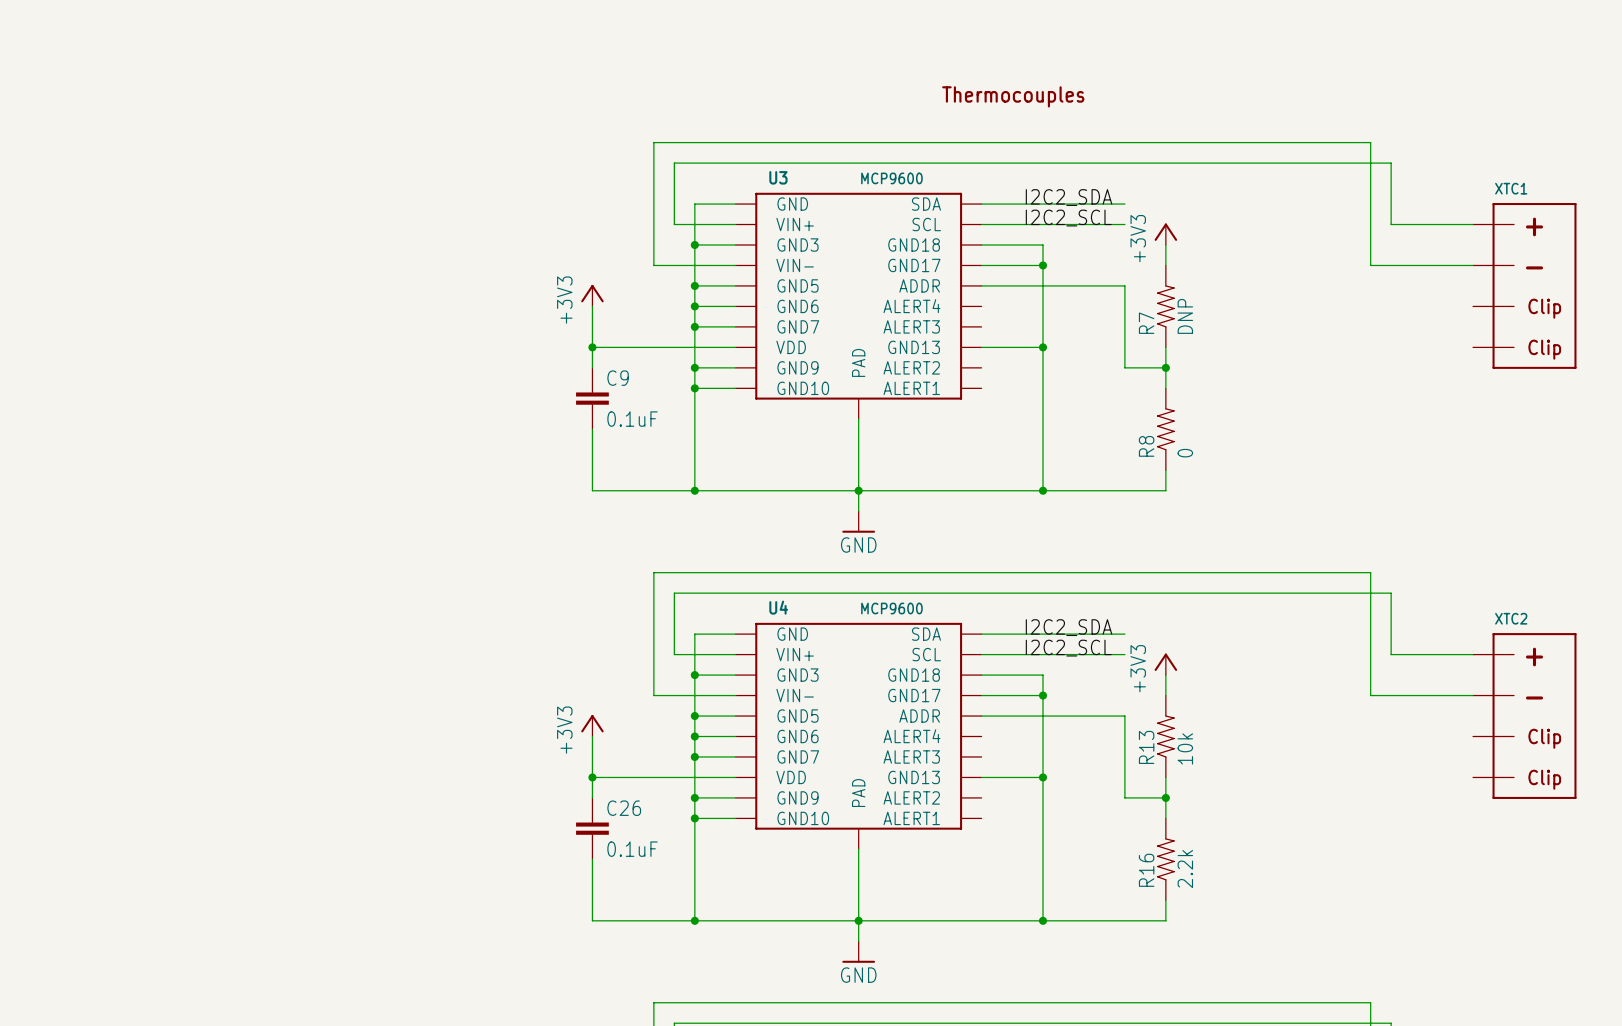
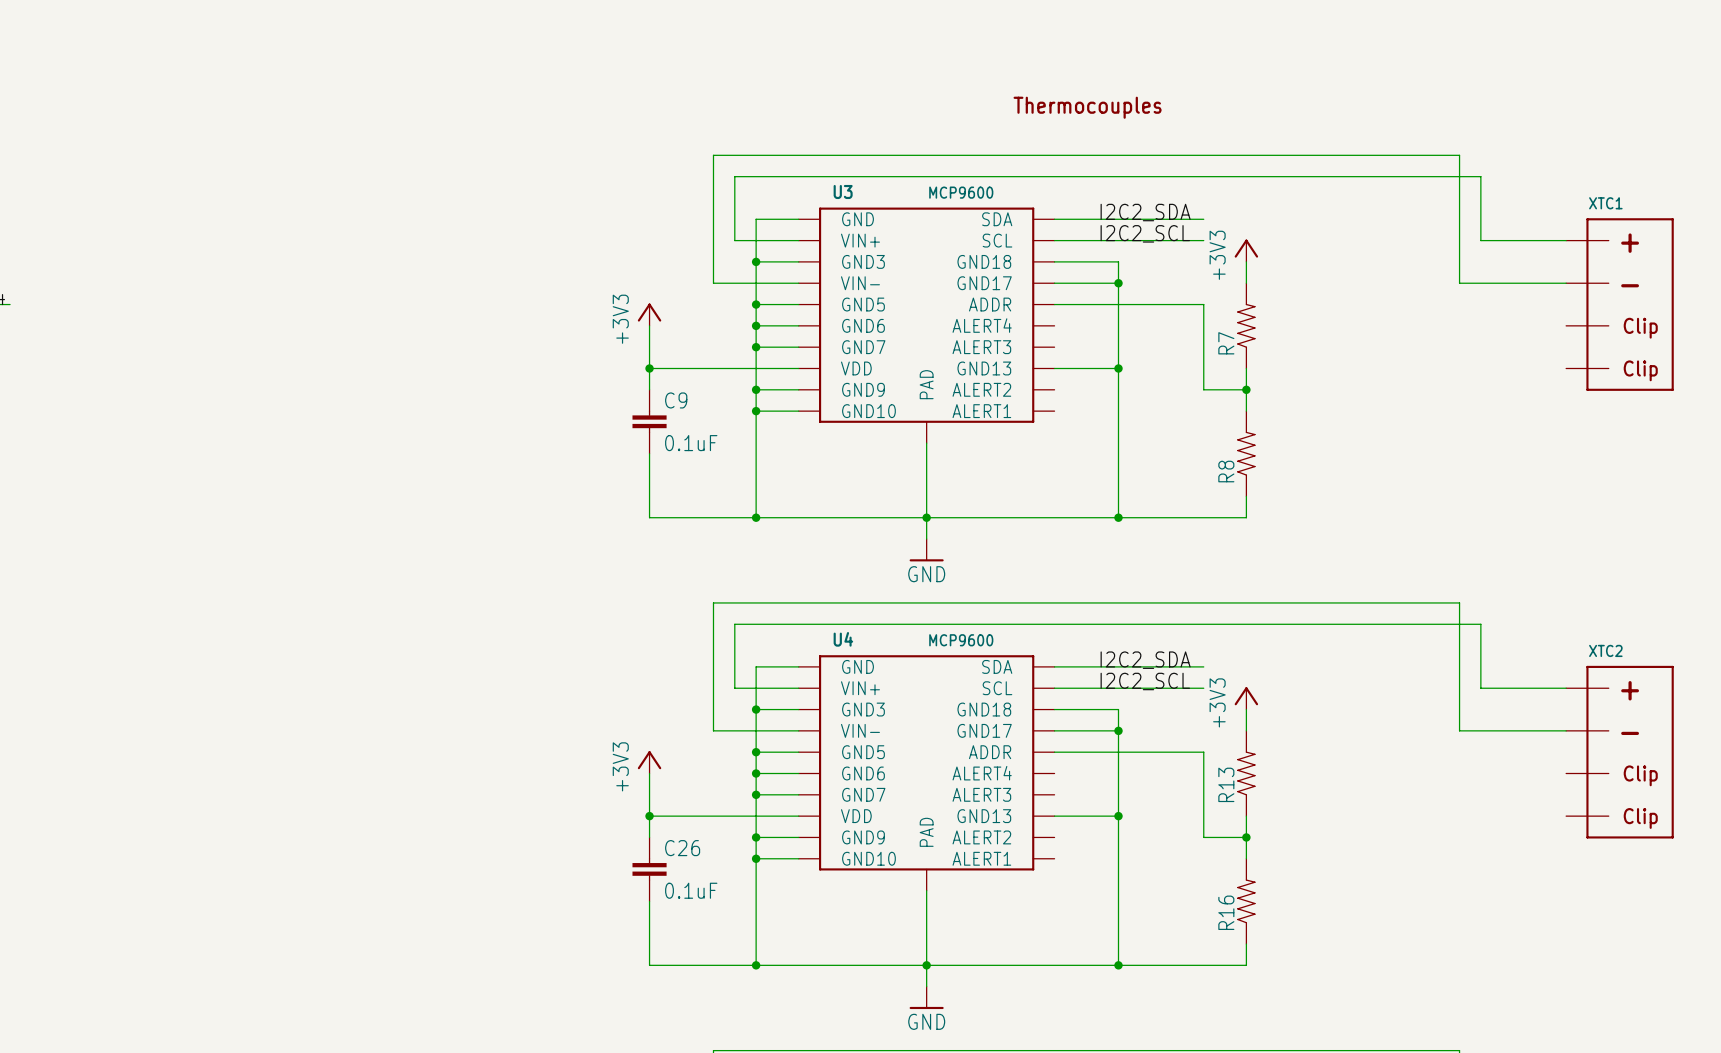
R7 value: DNP (1185, 316) -> none
R8 value: 0 (1185, 453) -> none
R13 value: 10k (1185, 748) -> none
R16 value: 2.2k (1185, 869) -> none

